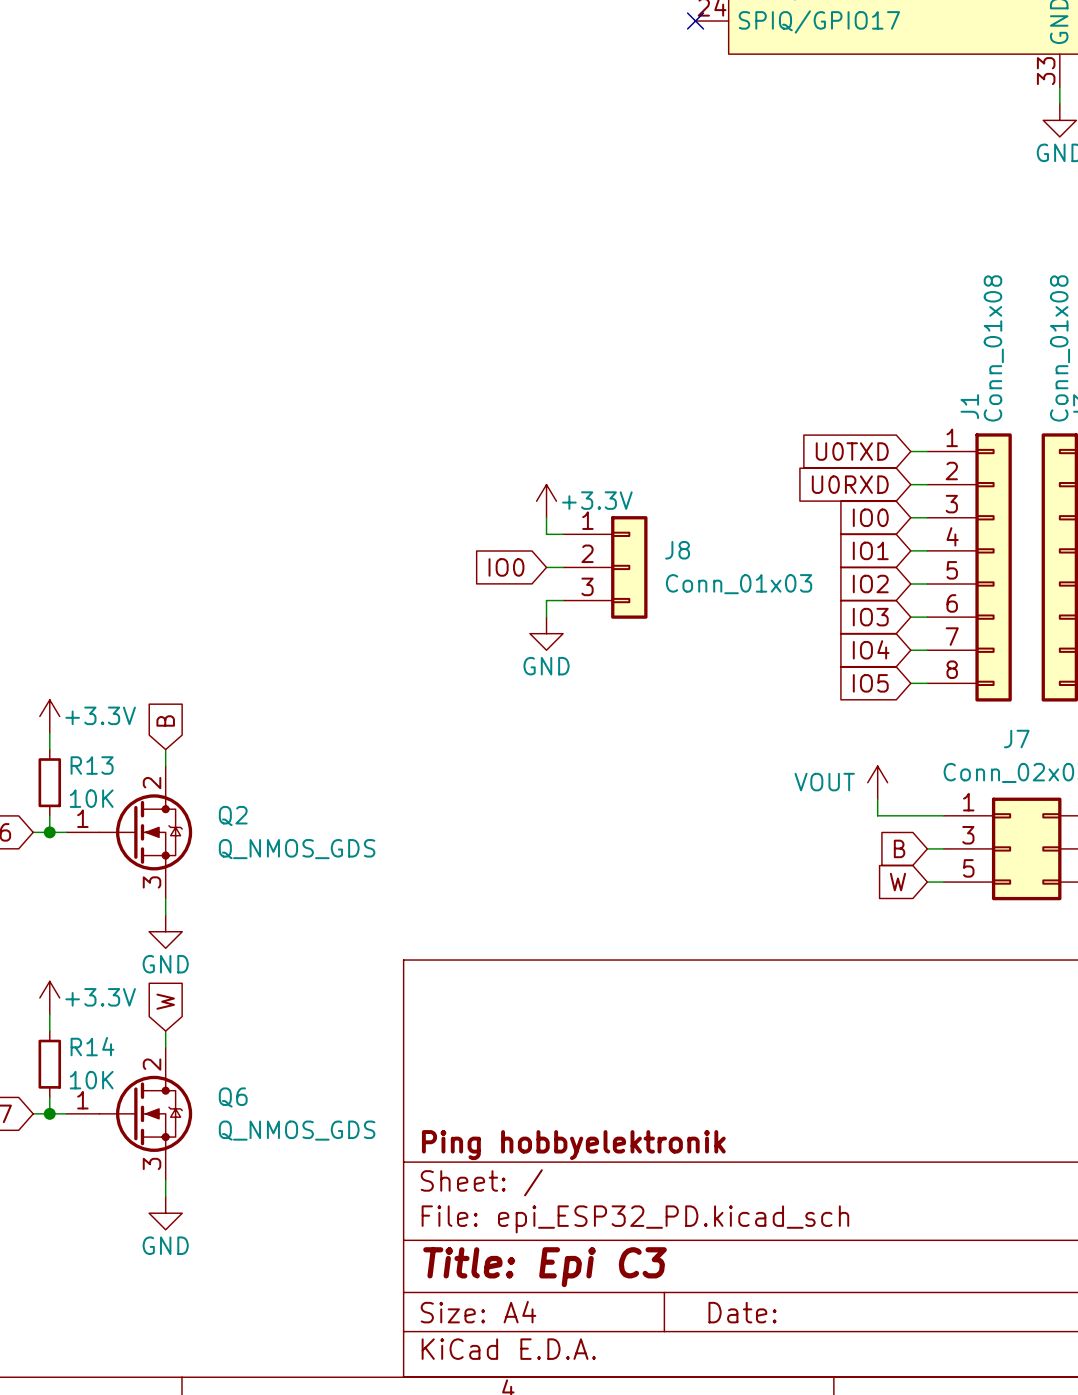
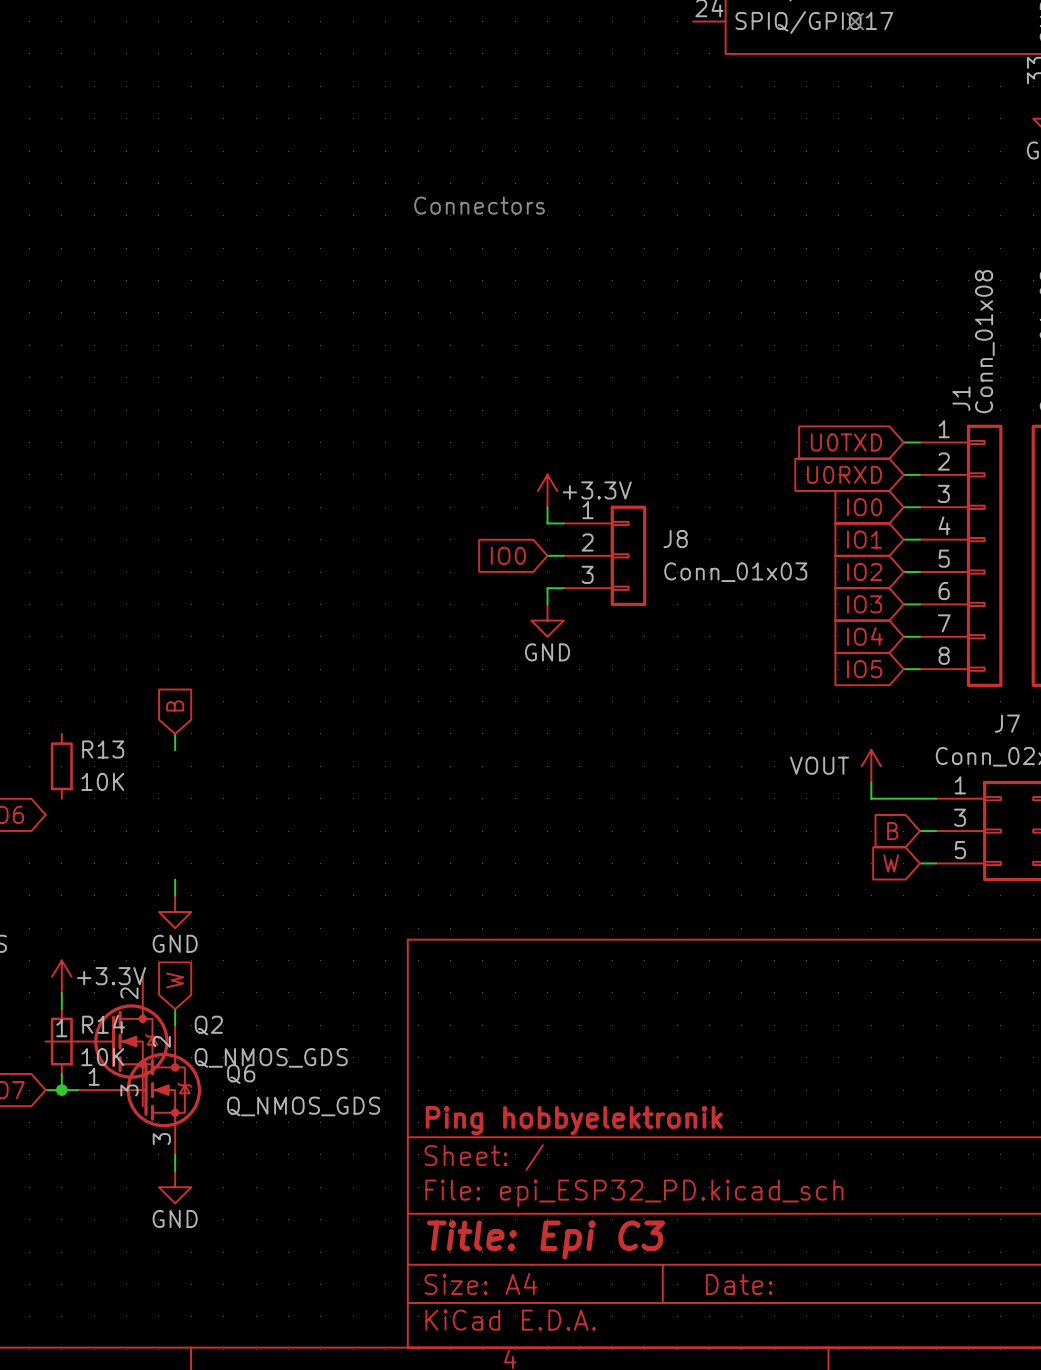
no-connect mark: (695, 21) -> none
no-connect mark: none -> (855, 21)
text: none -> Connectors (479, 205)
power symbol: +3.3V (49, 716) -> none
wire: (49, 733) (49, 749) -> none
wire: (49, 815) (49, 832) -> none
wire: (33, 832) (66, 832) -> none
junction: (49, 832) -> none
Q2 position: (129, 832) -> (107, 1041)

